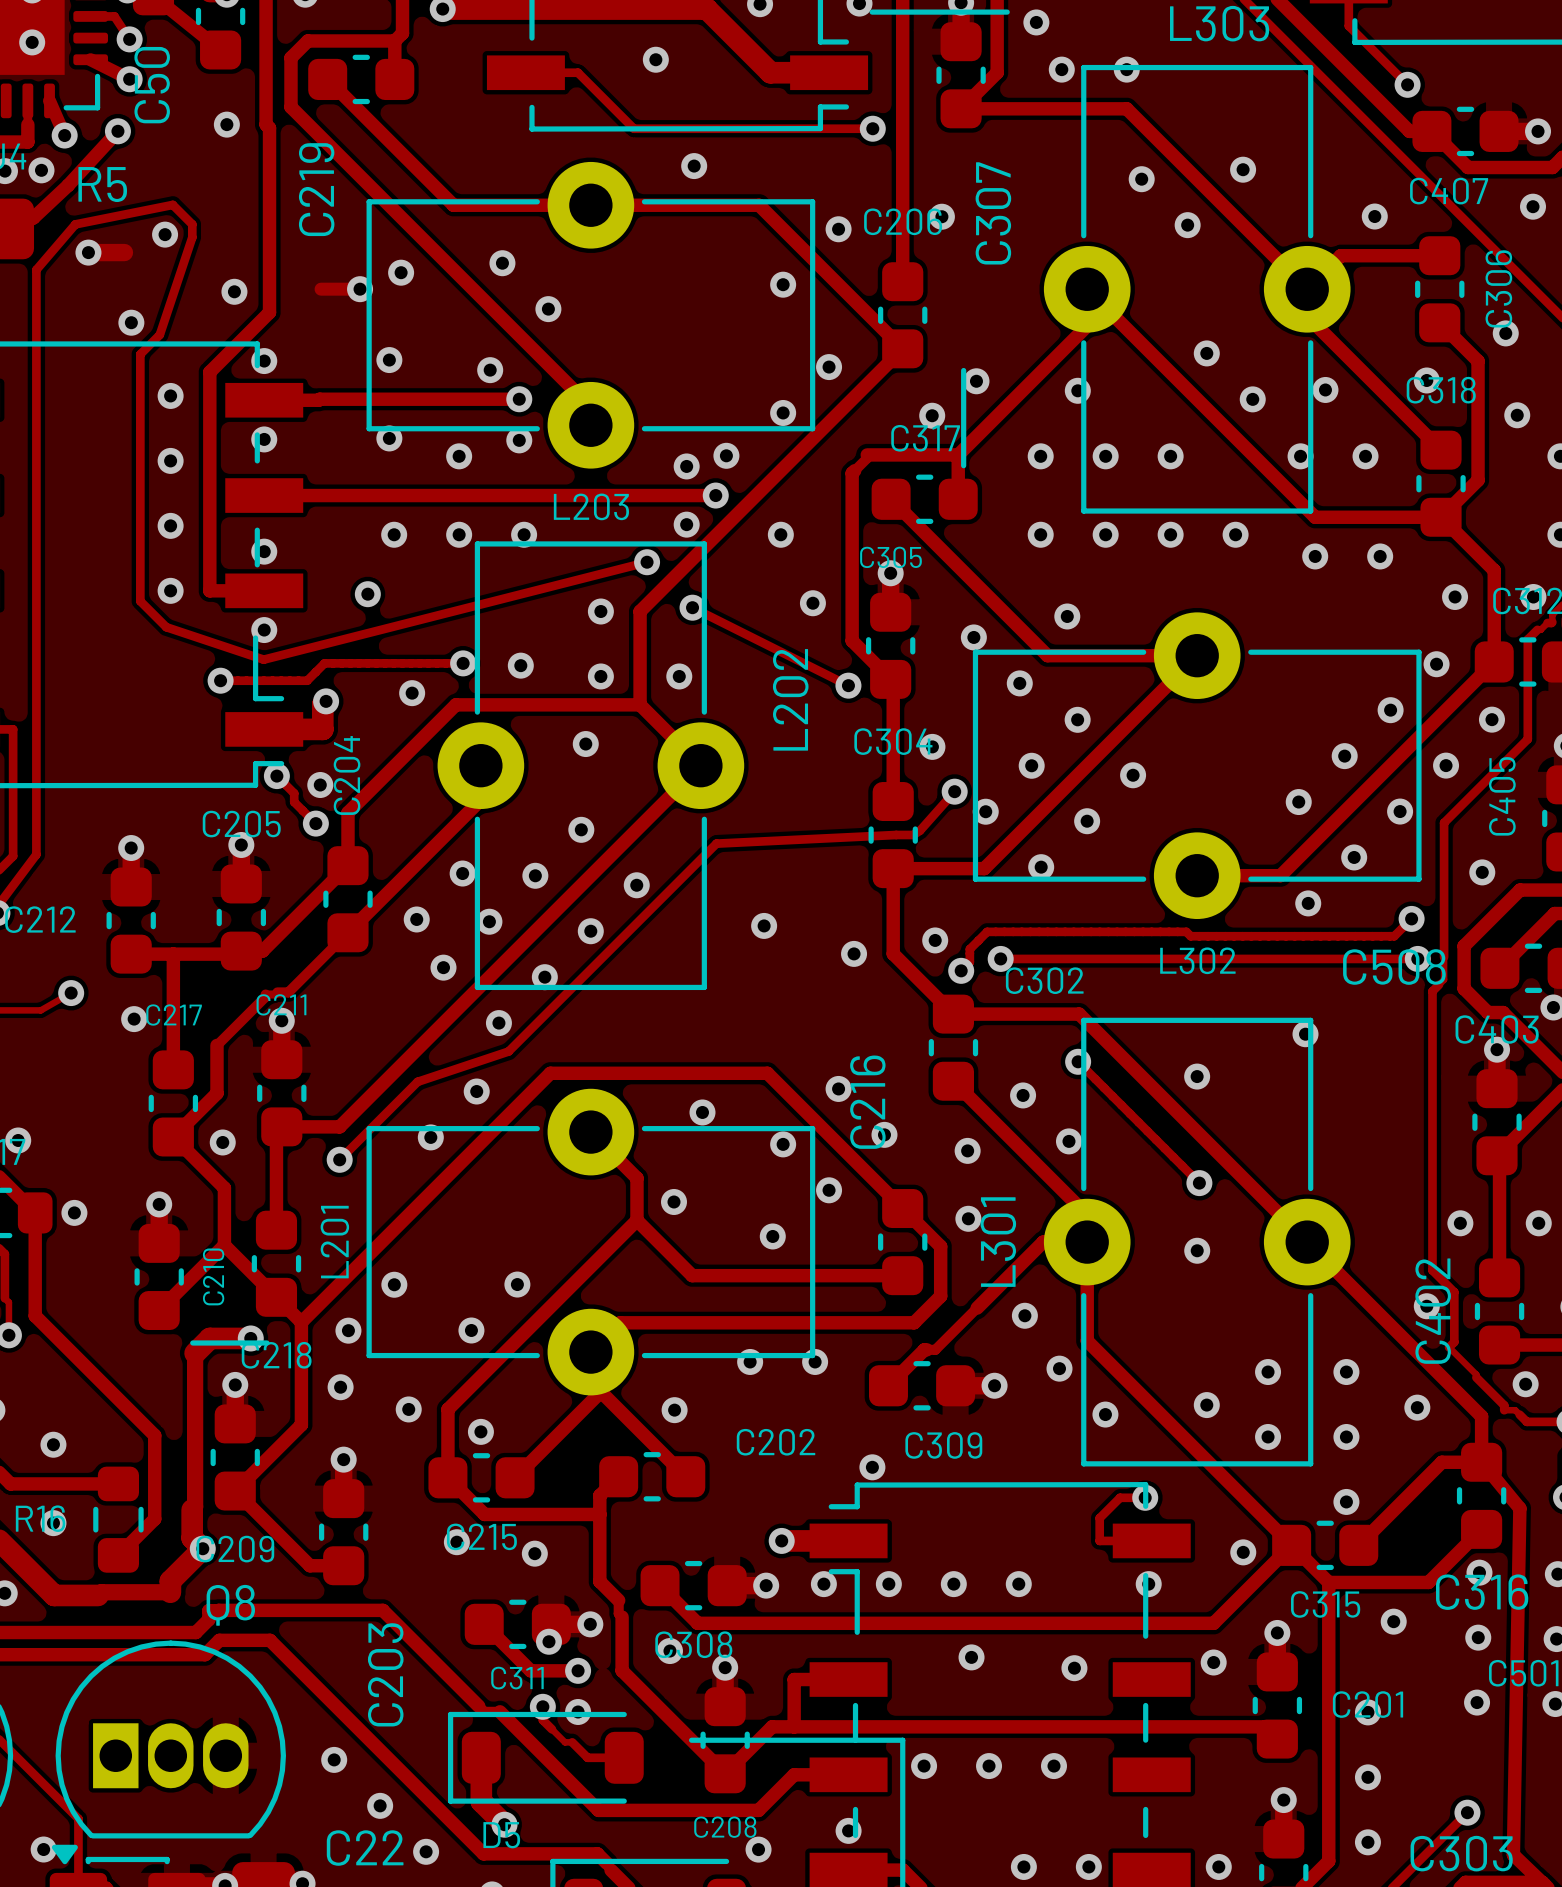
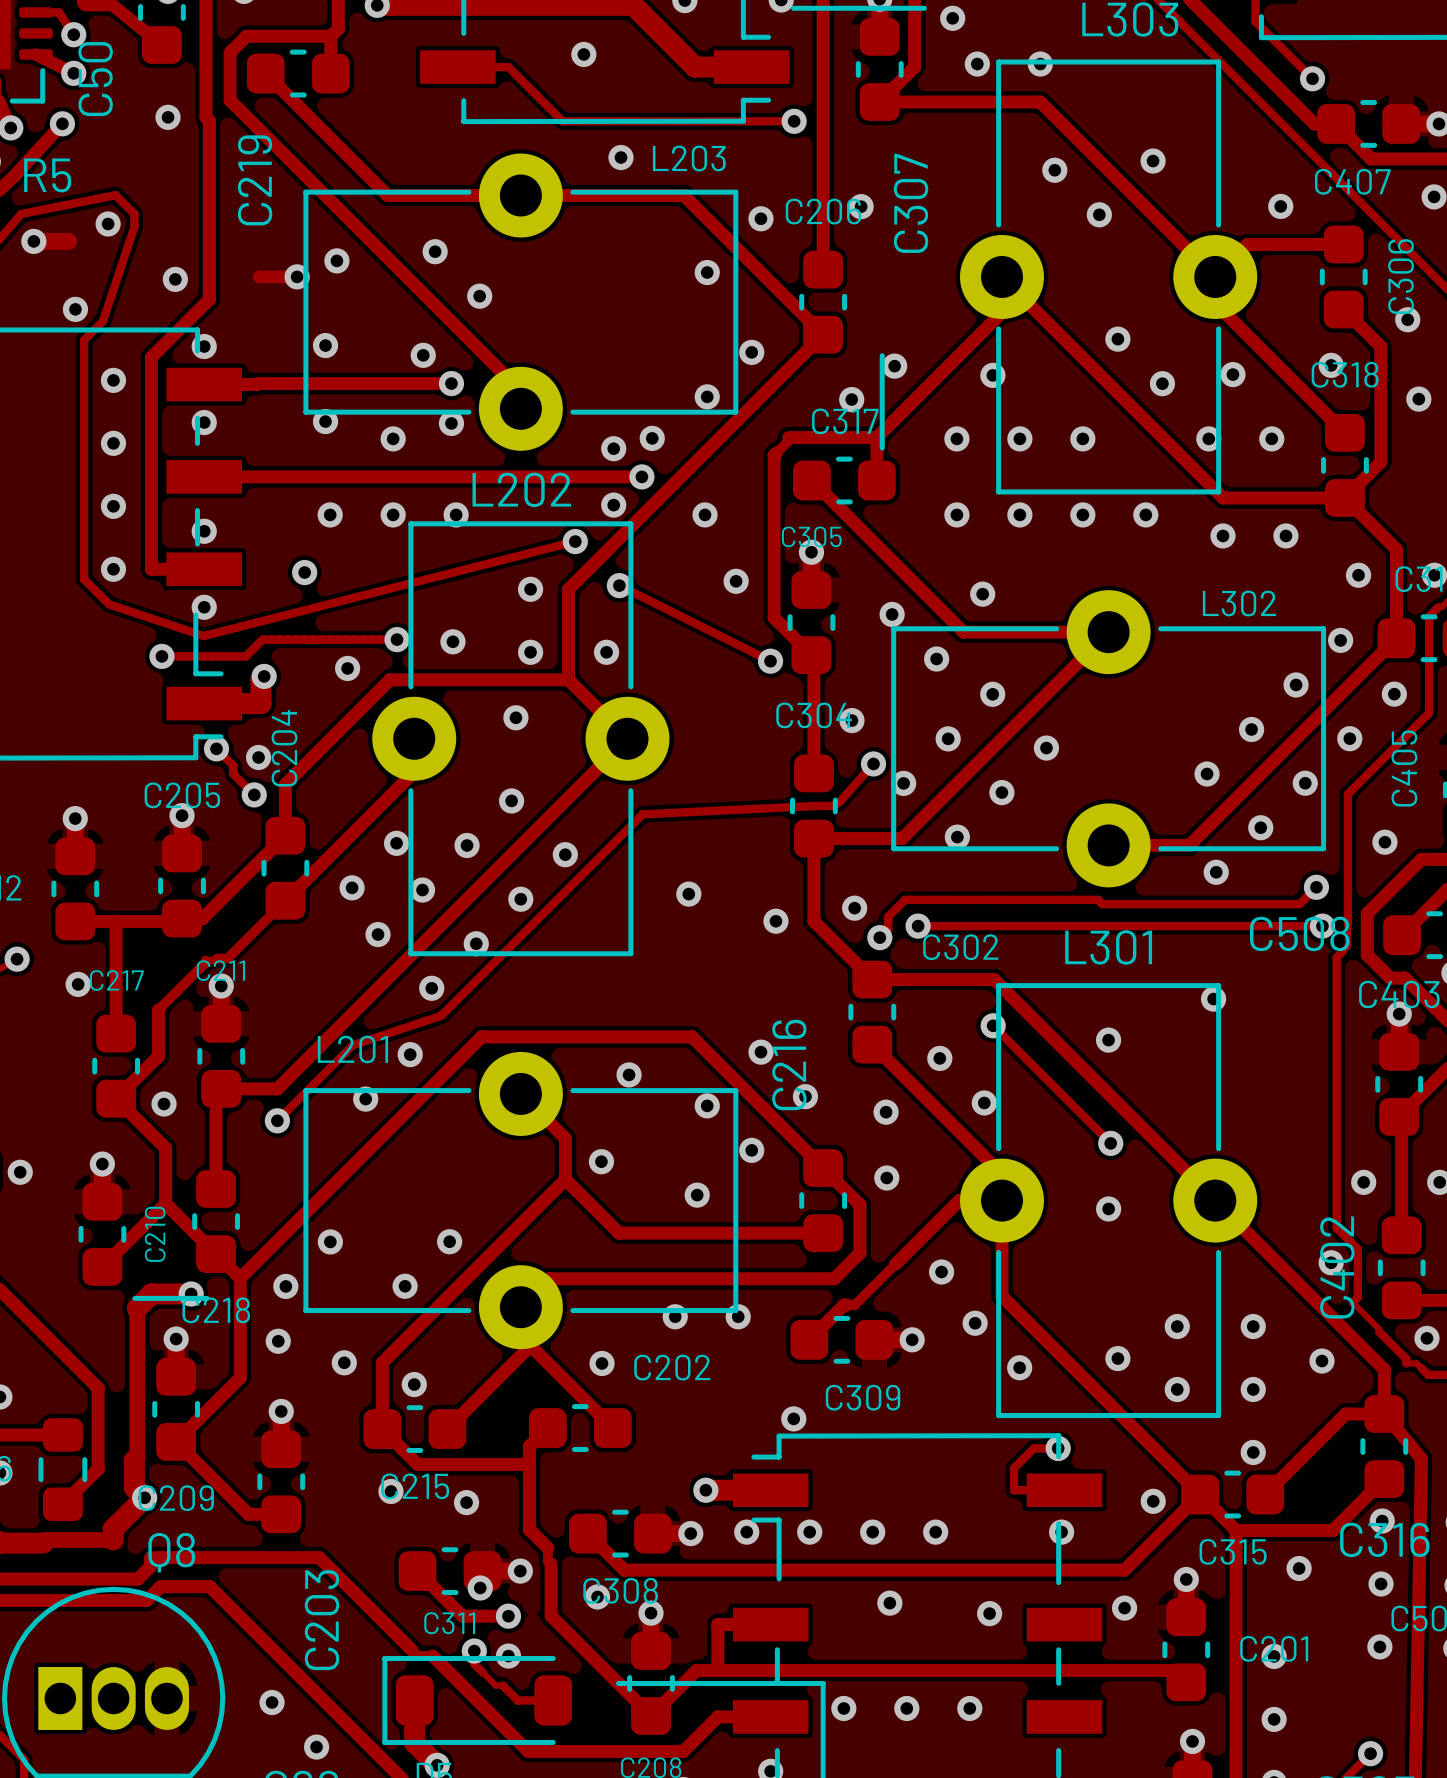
L203 name position: L203 (591, 506) -> L203 (689, 158)
L202 name rotation: 0° (790, 699) -> 90° clockwise (521, 489)
L202 name position: L202 (790, 699) -> L202 (521, 489)
L302 name position: L302 (1197, 960) -> L302 (1239, 603)
L201 name rotation: 0° (334, 1242) -> 90° clockwise (352, 1049)
L201 name position: L201 (334, 1242) -> L201 (352, 1049)
L301 name rotation: 0° (998, 1242) -> 90° clockwise (1108, 947)
L301 name position: L301 (998, 1242) -> L301 (1108, 947)
C202 name position: C202 (776, 1442) -> C202 (672, 1367)

